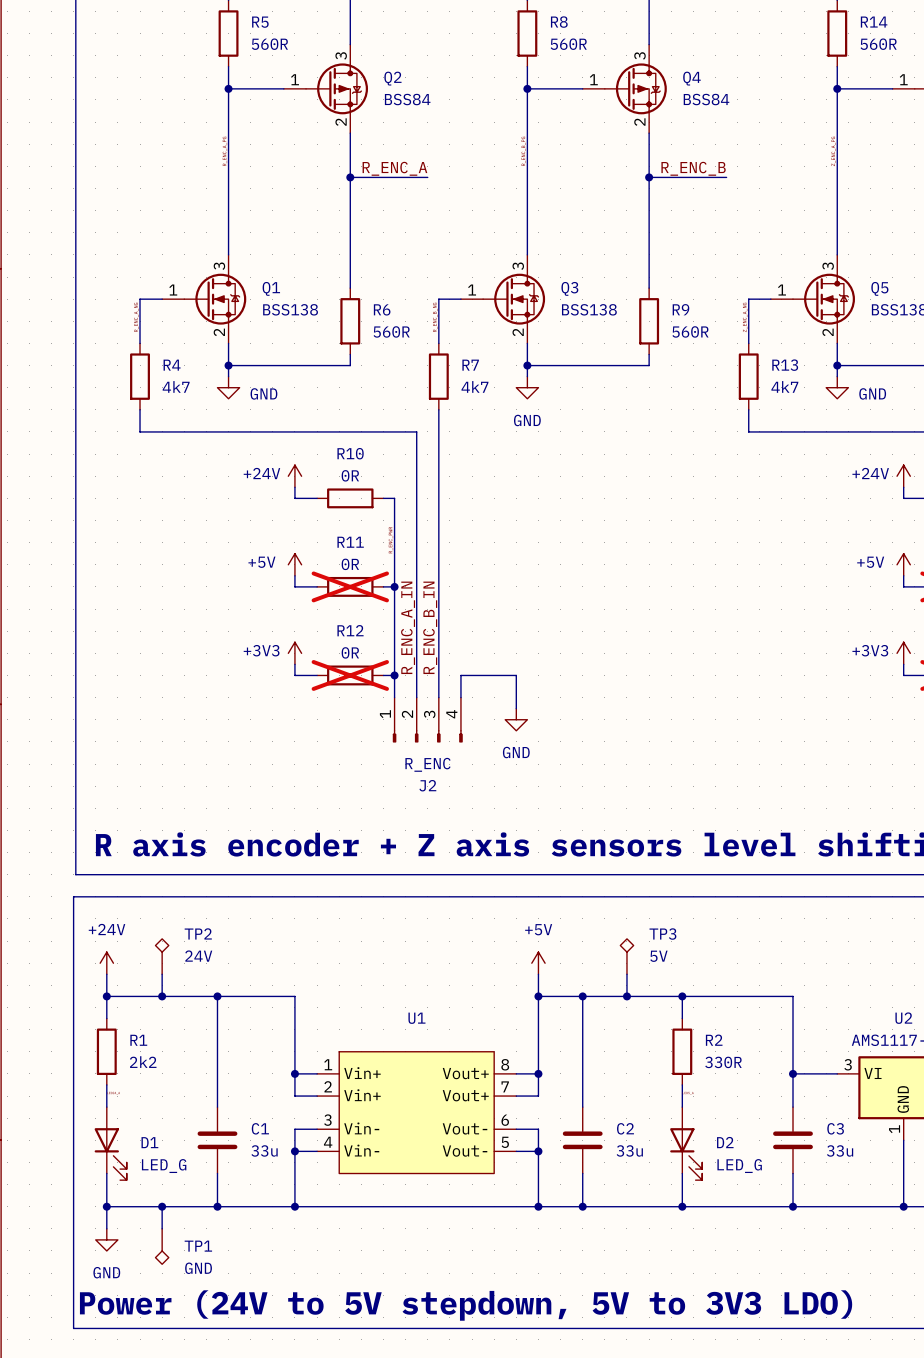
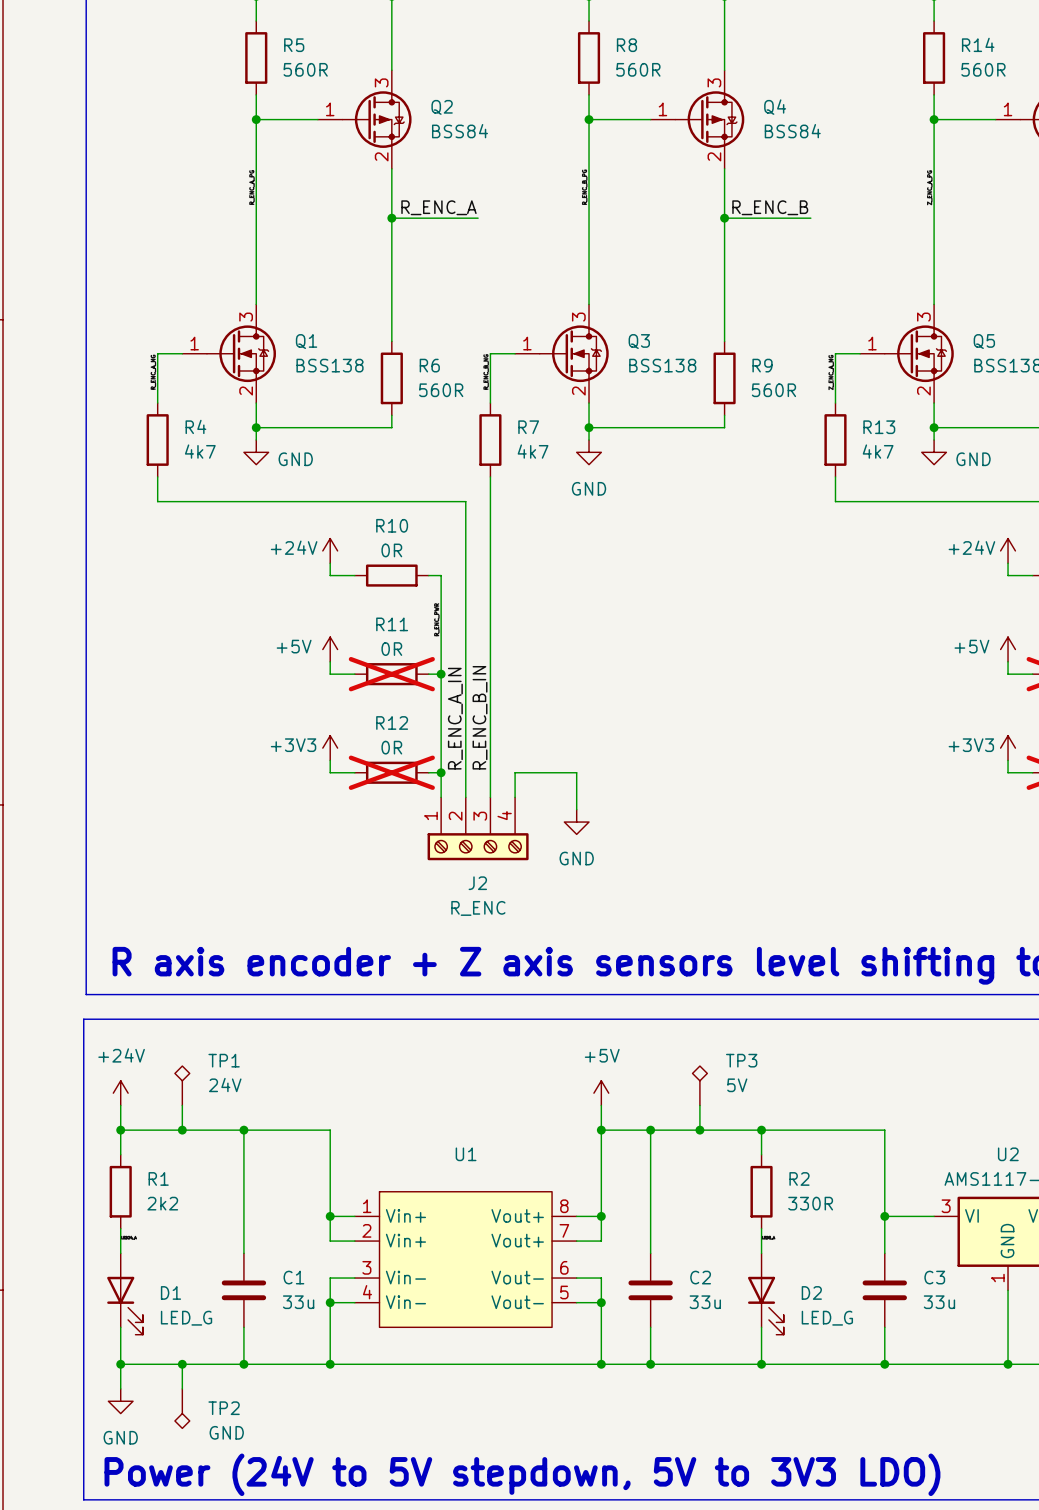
J2 symbol: [392, 697, 463, 743] -> [427, 797, 529, 861]
J2 value position: R_ENC (427, 764) -> R_ENC (478, 908)
TP2 name: TP2 (198, 933) -> TP1 (224, 1060)
TP1 name: TP1 (198, 1246) -> TP2 (224, 1408)

